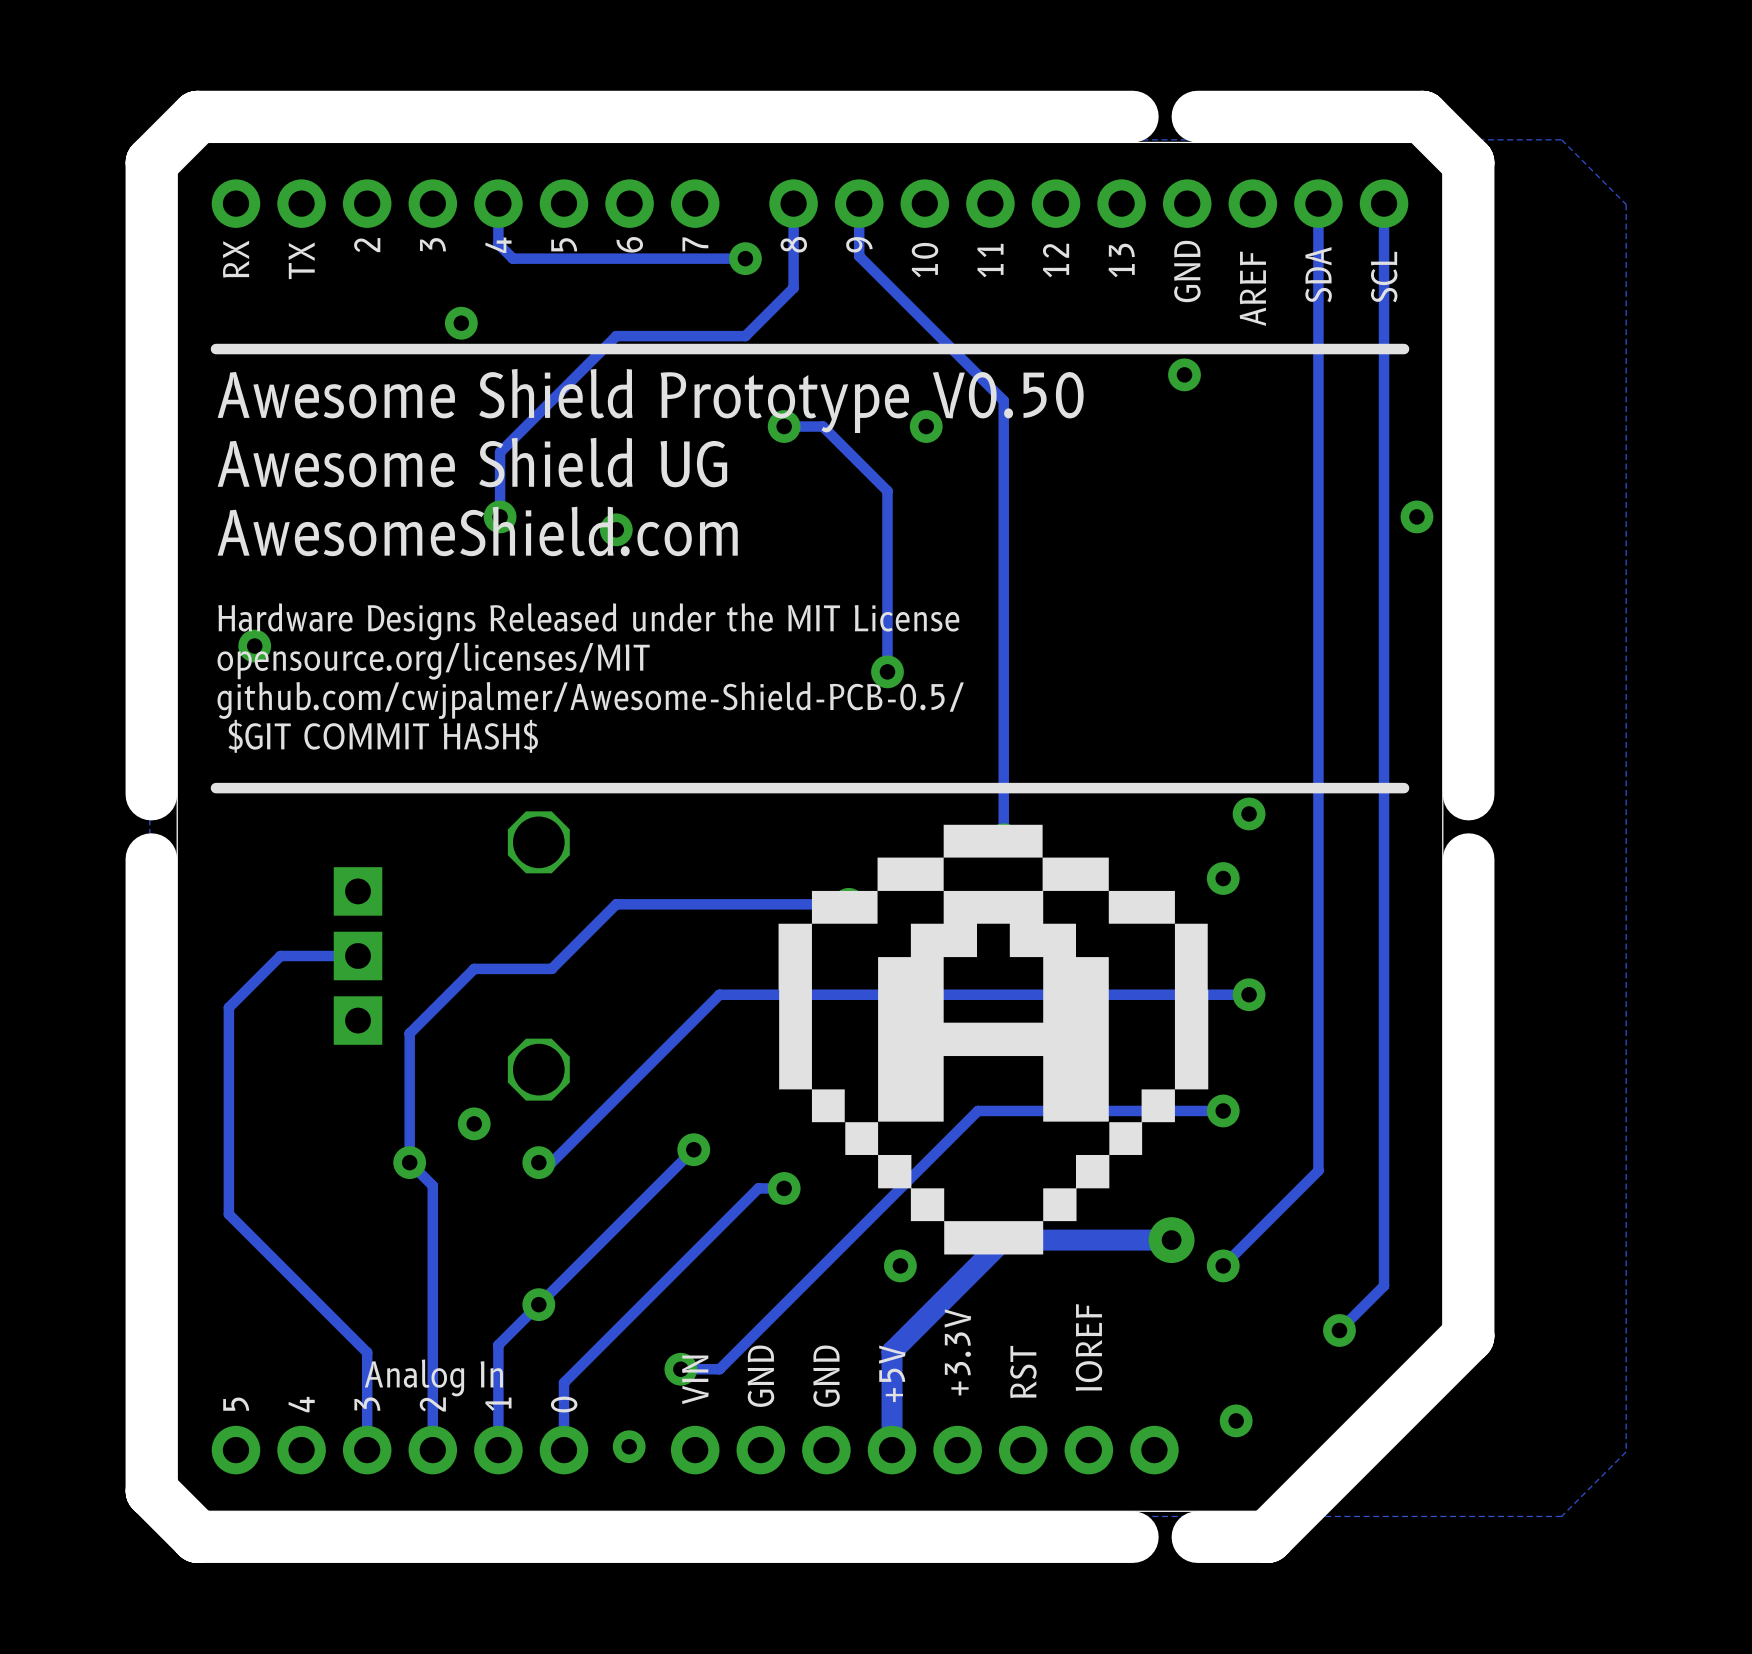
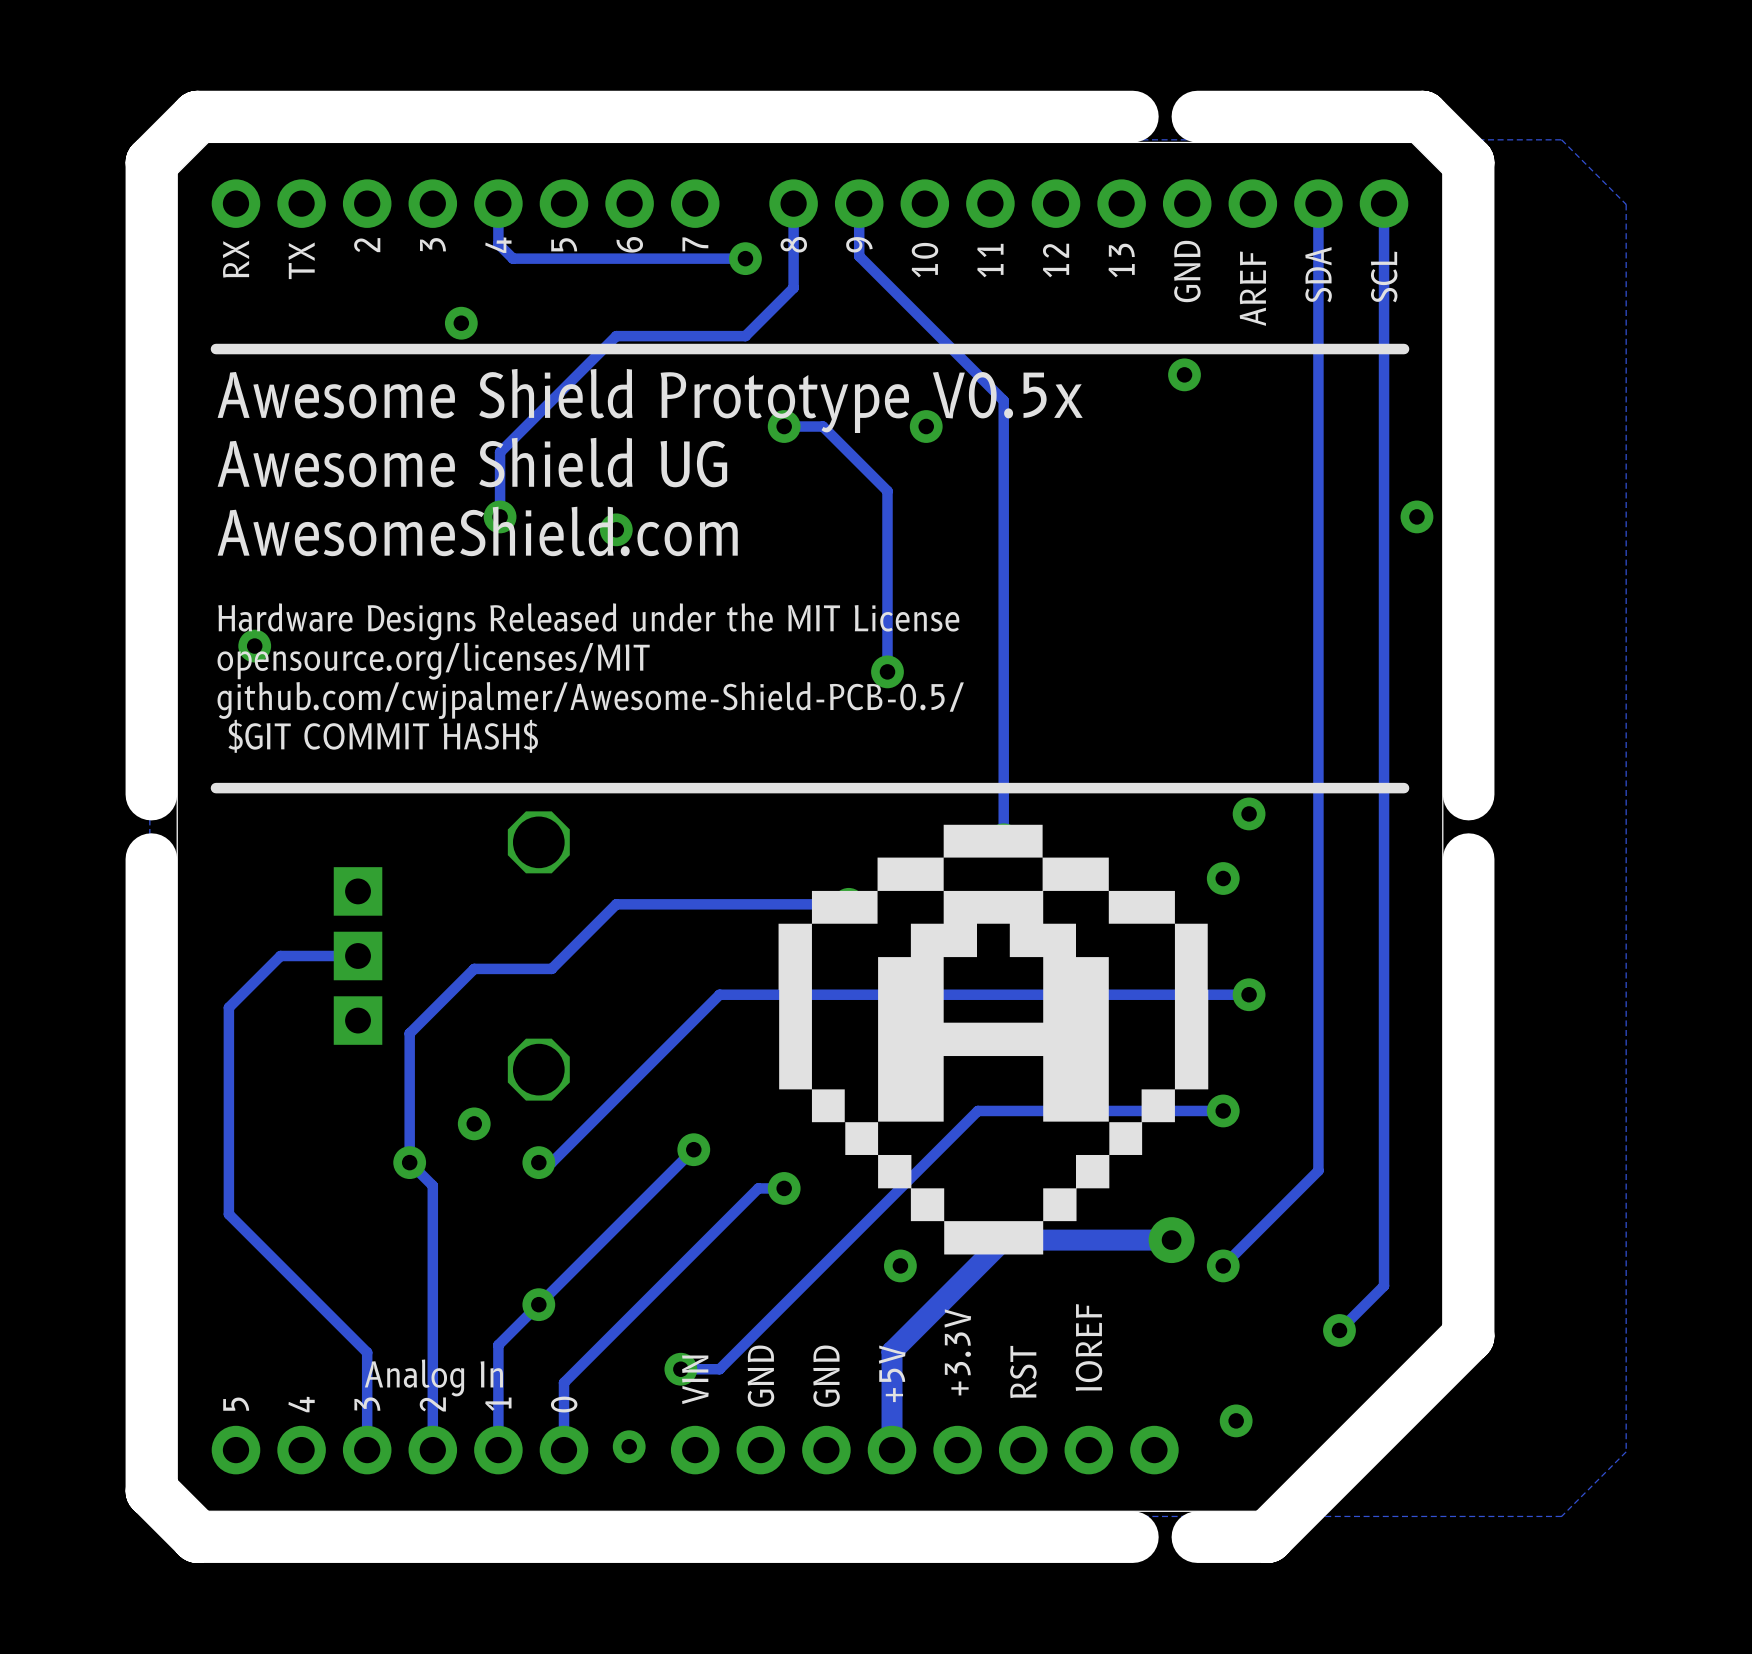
text: Awesome Shield Prototype V0.50 (650, 400) -> Awesome Shield Prototype V0.5x (650, 400)

